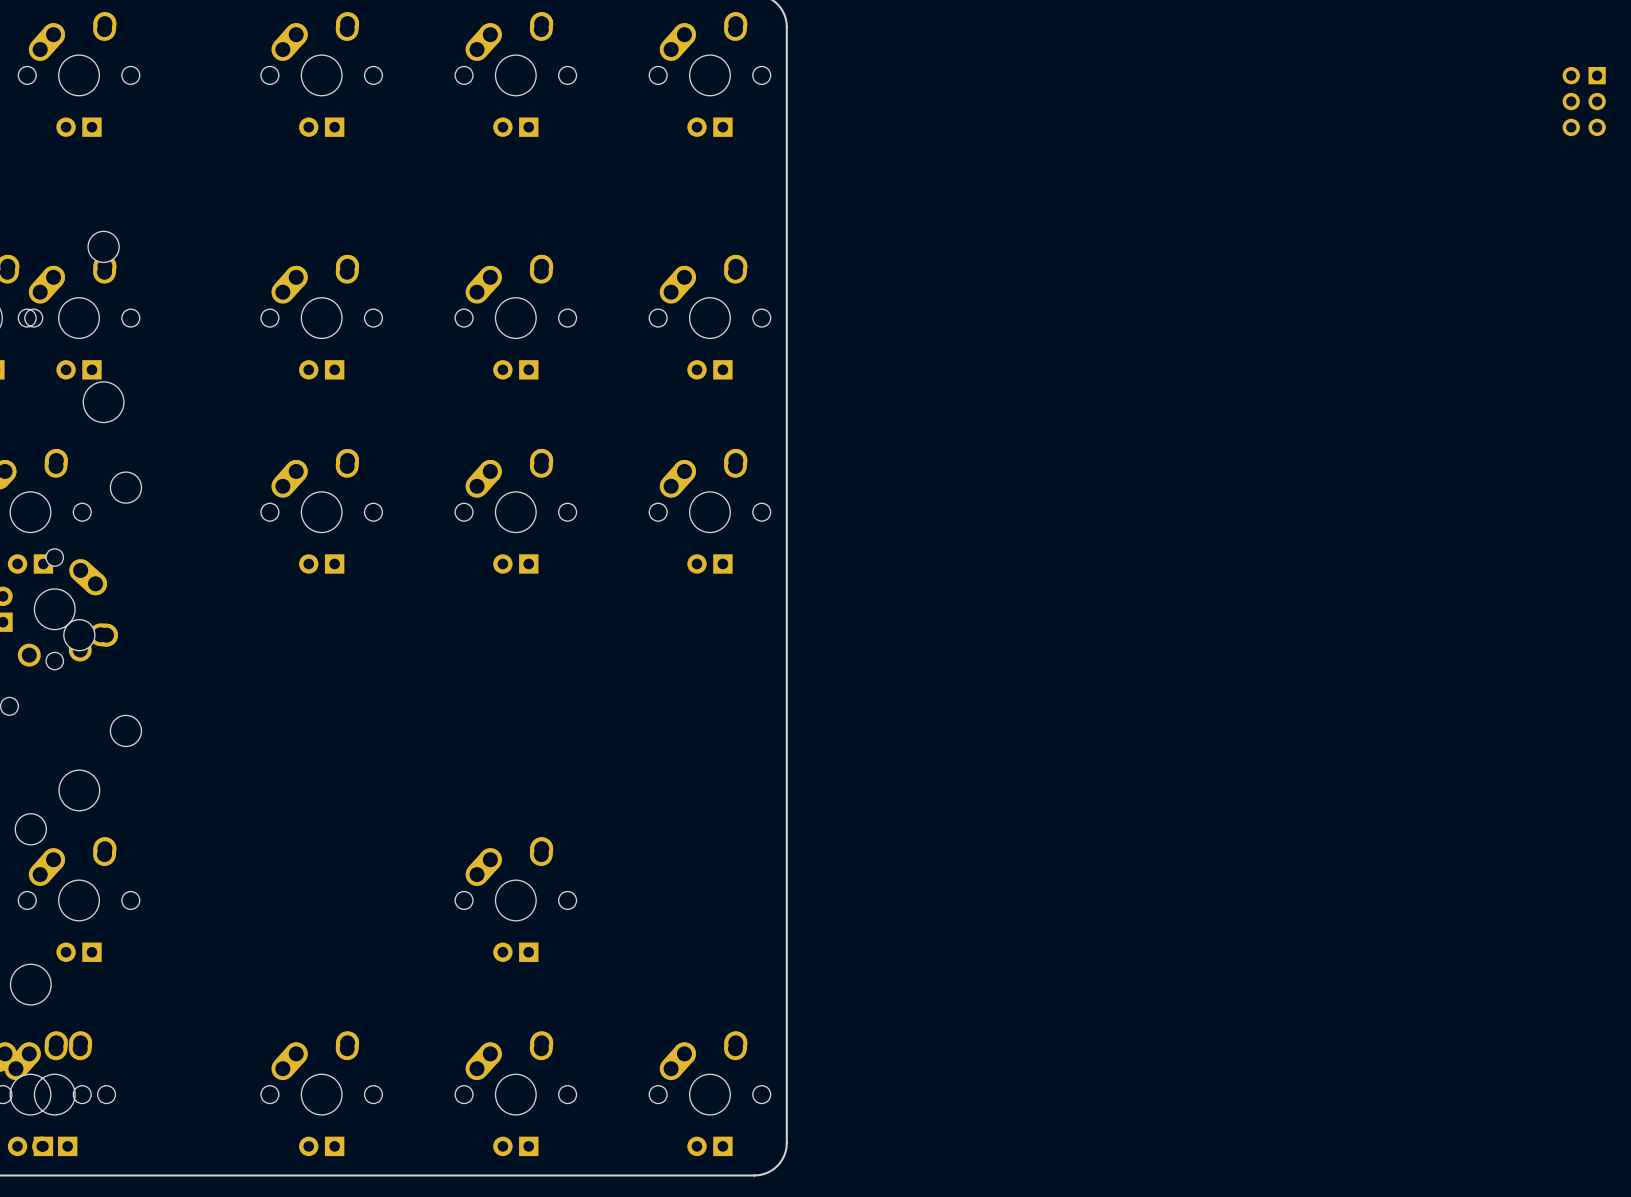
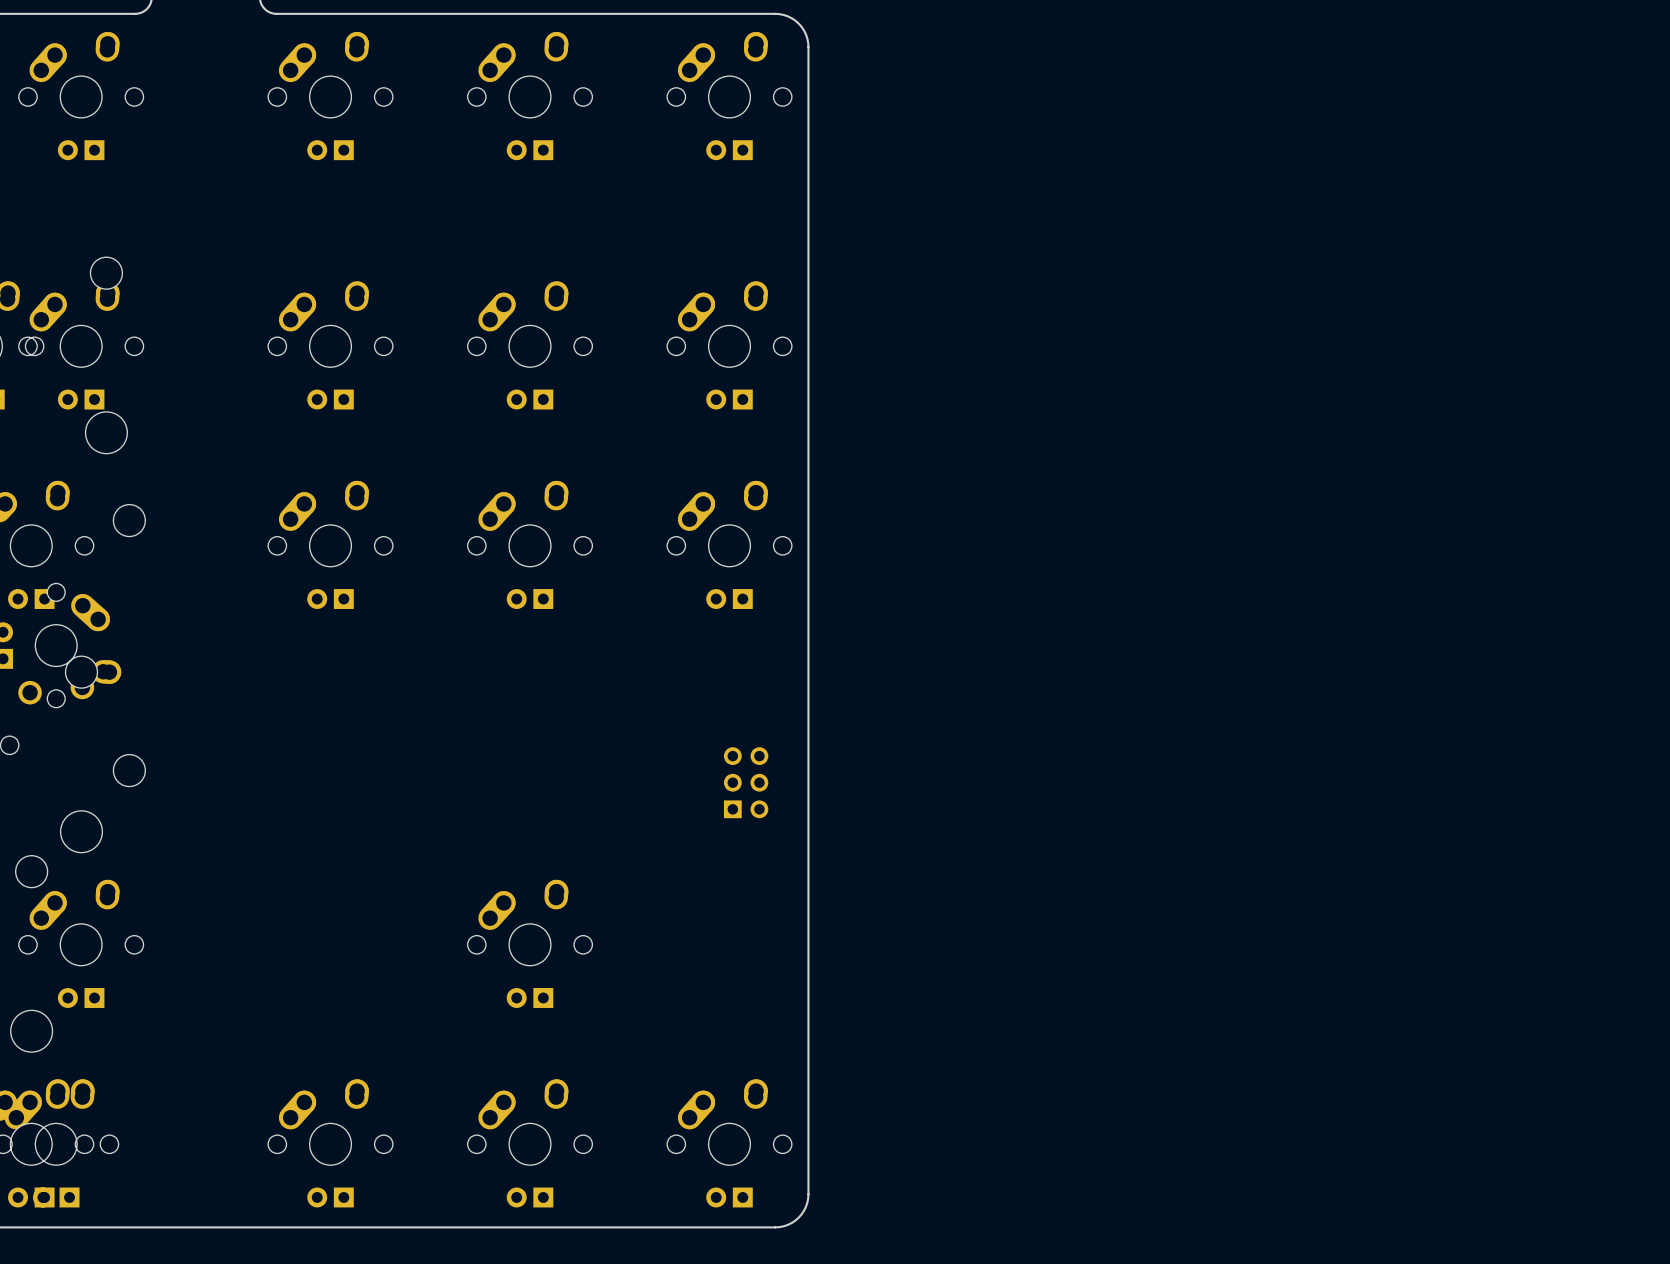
part: (1584, 101) -> none
part: none -> (746, 782)

